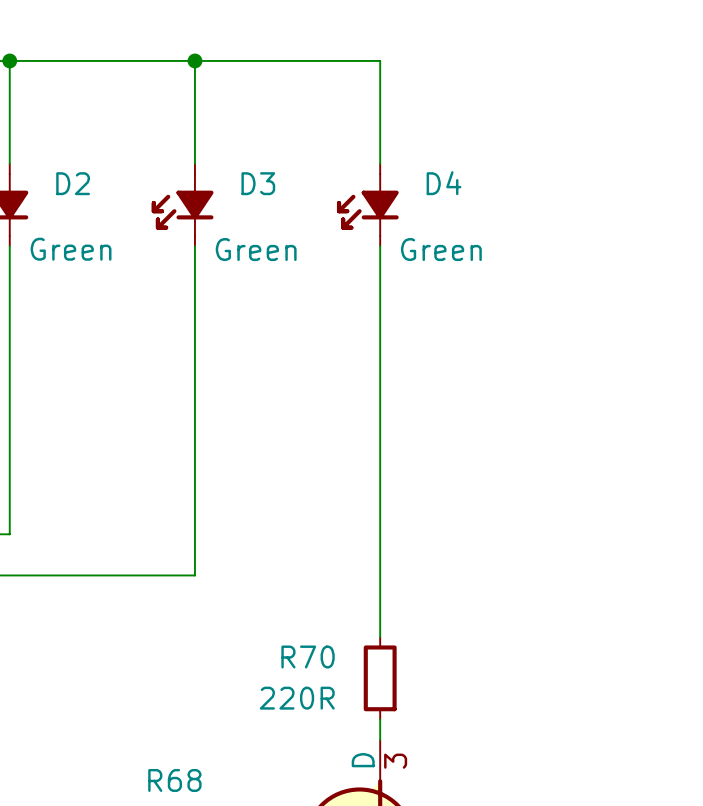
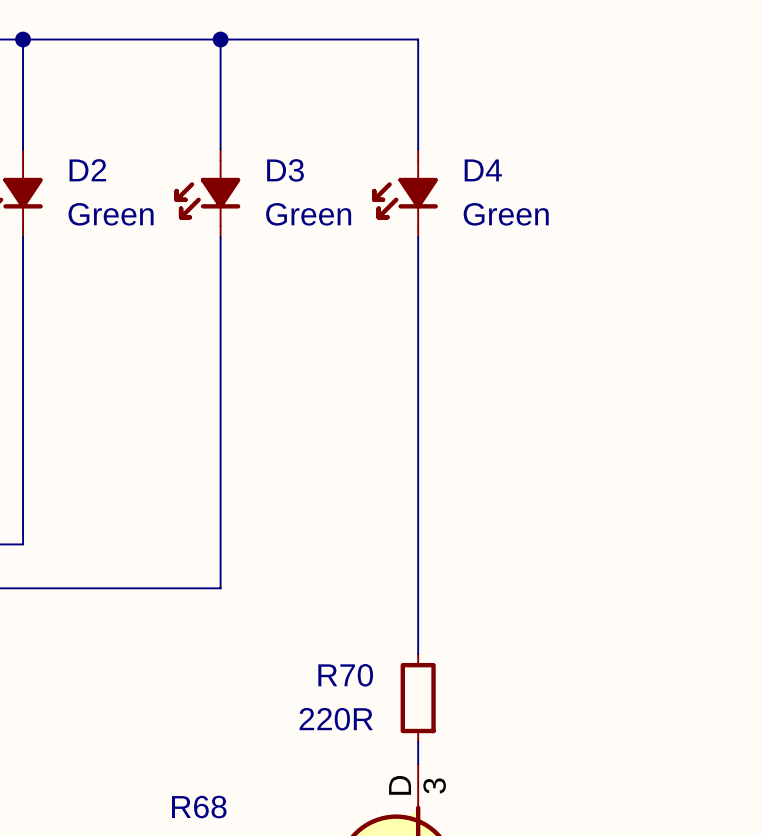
D2 text position: Green (71, 249) -> Green (111, 214)
D3 text position: Green (256, 249) -> Green (308, 214)
D4 text position: Green (441, 249) -> Green (506, 214)

